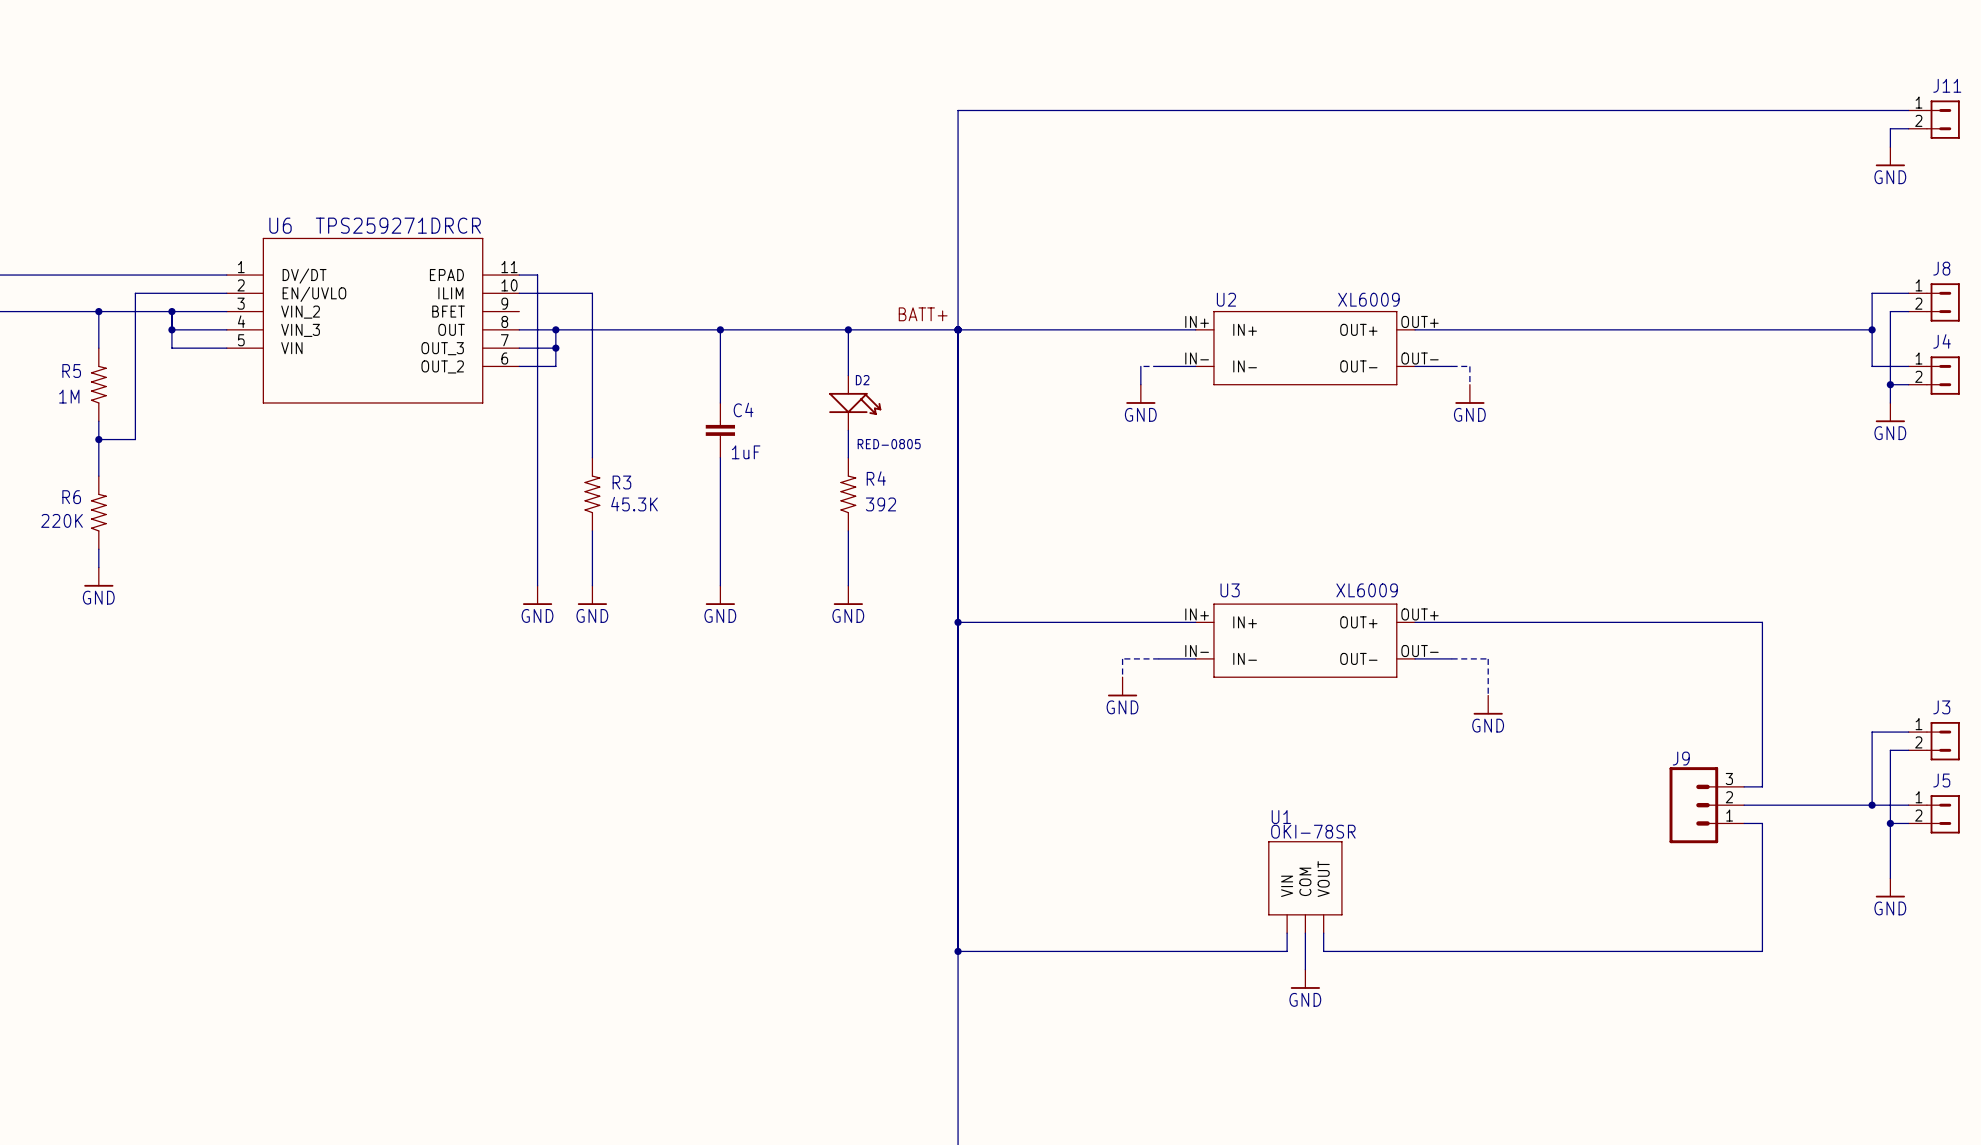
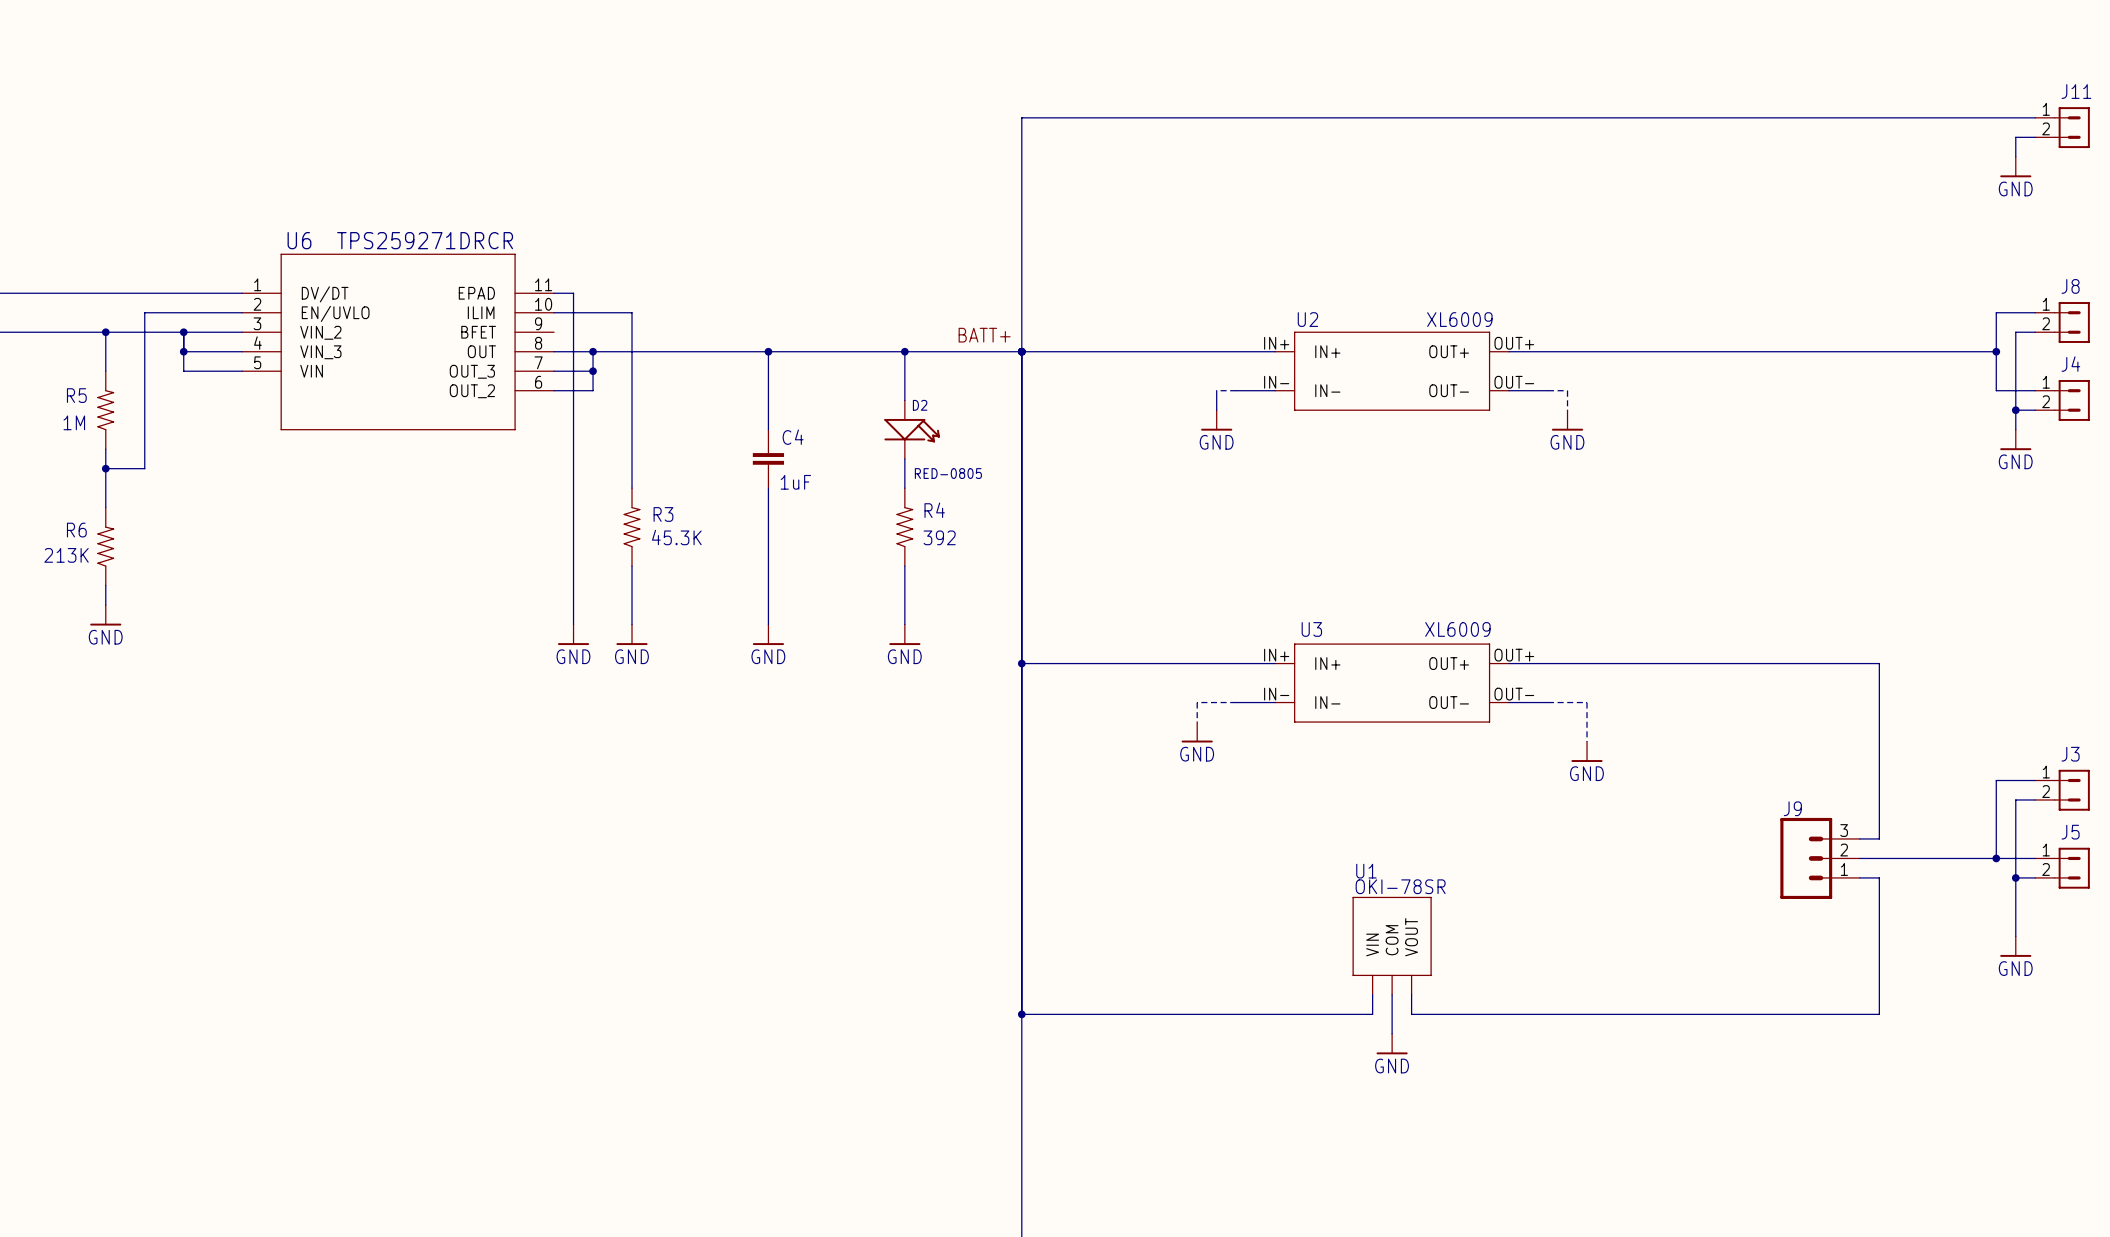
R6 value: 220K (61, 520) -> 213K (66, 555)

